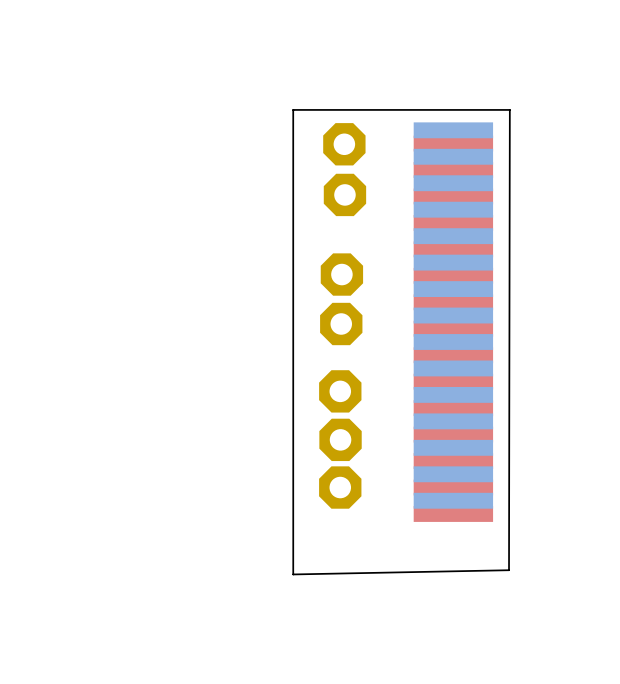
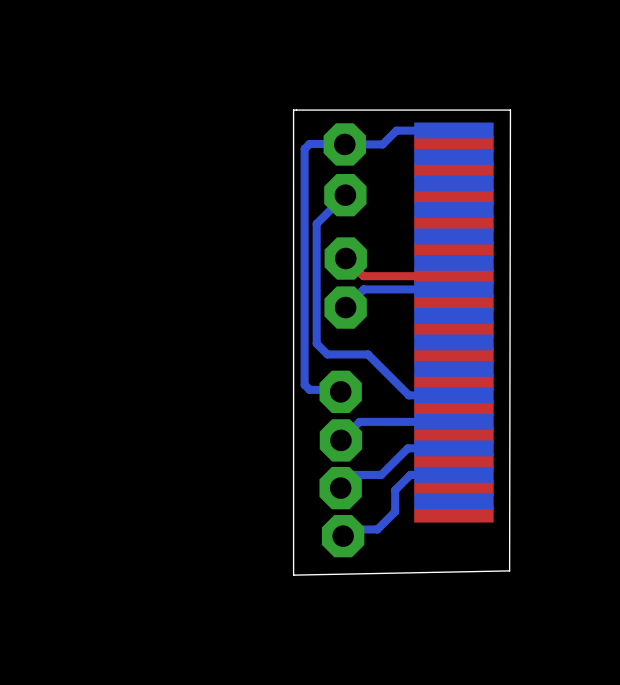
bottom track: none -> (453, 130) (396, 130) (382, 144) (309, 143) (304, 149) (304, 384) (309, 389) (343, 389)
bottom track: none -> (345, 195) (316, 223) (316, 343) (327, 354) (367, 354) (408, 395) (453, 395)
top track: none -> (345, 258) (363, 276) (453, 276)
part: none -> (345, 258)
part: (341, 274) -> none
bottom track: none -> (453, 289) (363, 289) (345, 307)
part: none -> (345, 307)
part: (341, 324) -> none
bottom track: none -> (453, 421) (359, 421) (343, 437)
bottom track: none -> (453, 448) (407, 448) (381, 474) (354, 474) (343, 485)
bottom track: none -> (453, 474) (410, 474) (395, 490) (395, 511) (377, 529) (349, 529) (343, 536)
part: none -> (343, 536)

